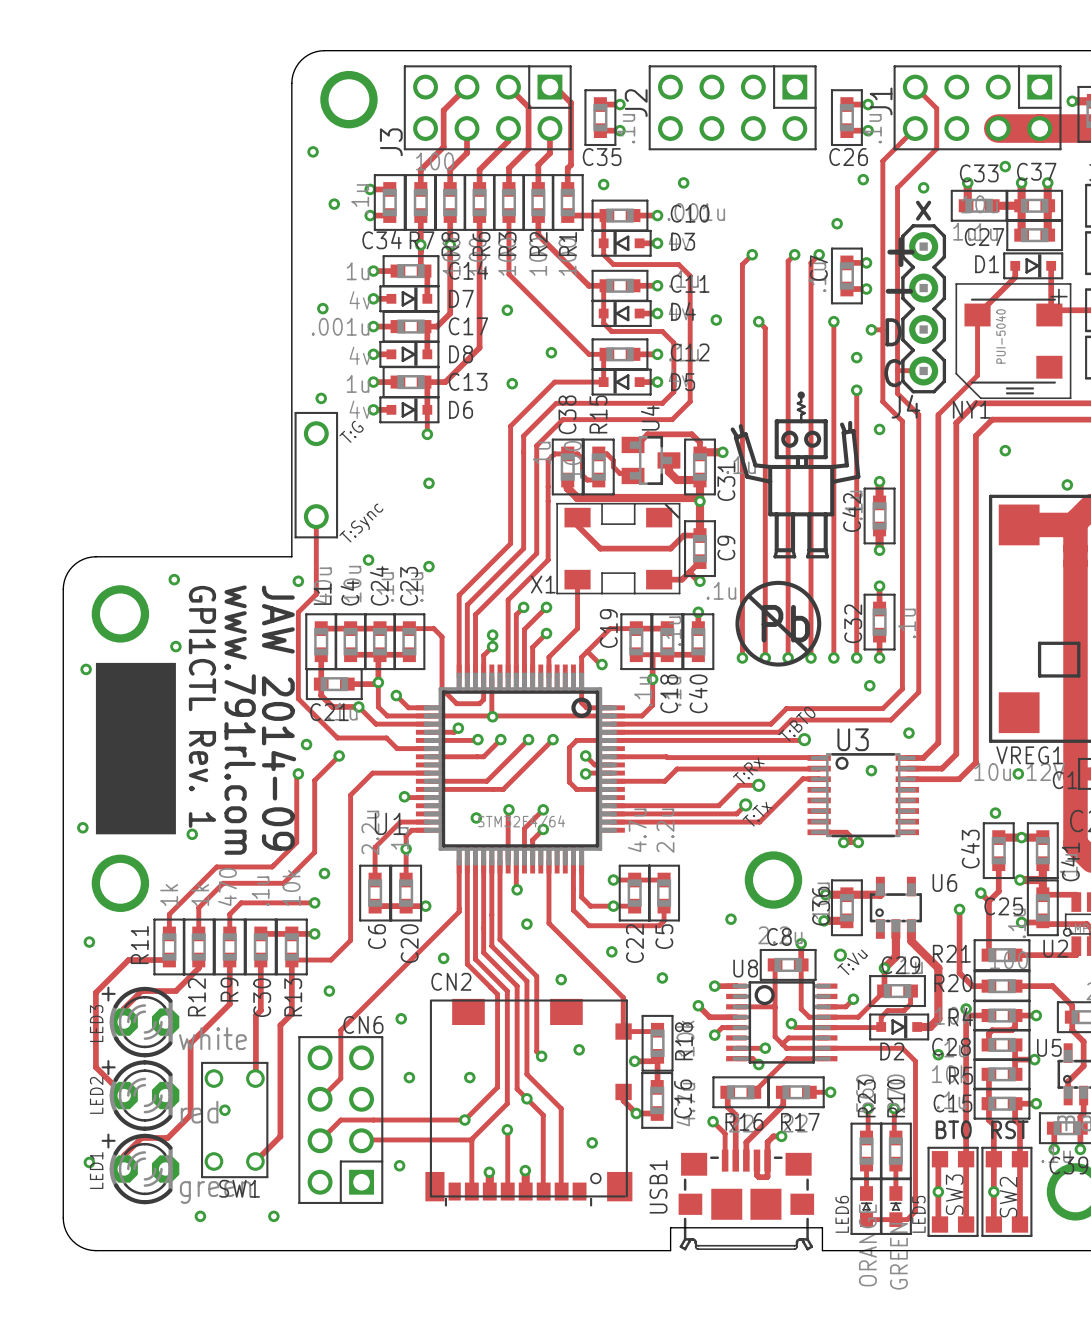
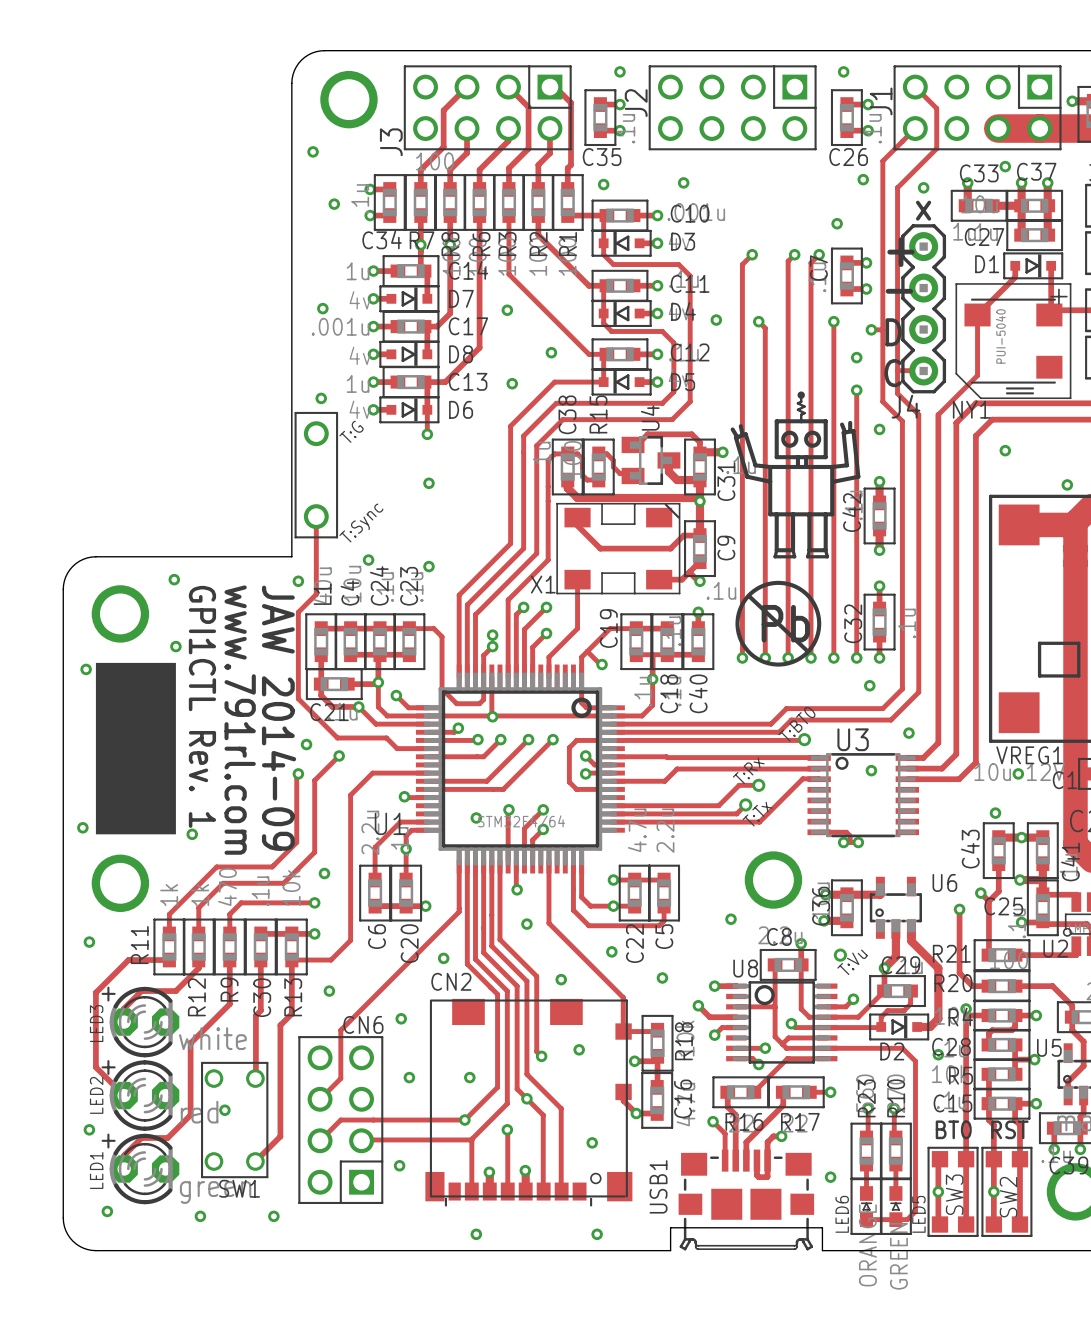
via: none -> (619, 71)
via: none -> (843, 71)
via: none -> (89, 1129)
via: (89, 1162) -> none
via: none -> (830, 1177)
via: none -> (107, 1211)
via: none -> (476, 1234)
via: none -> (597, 1234)

